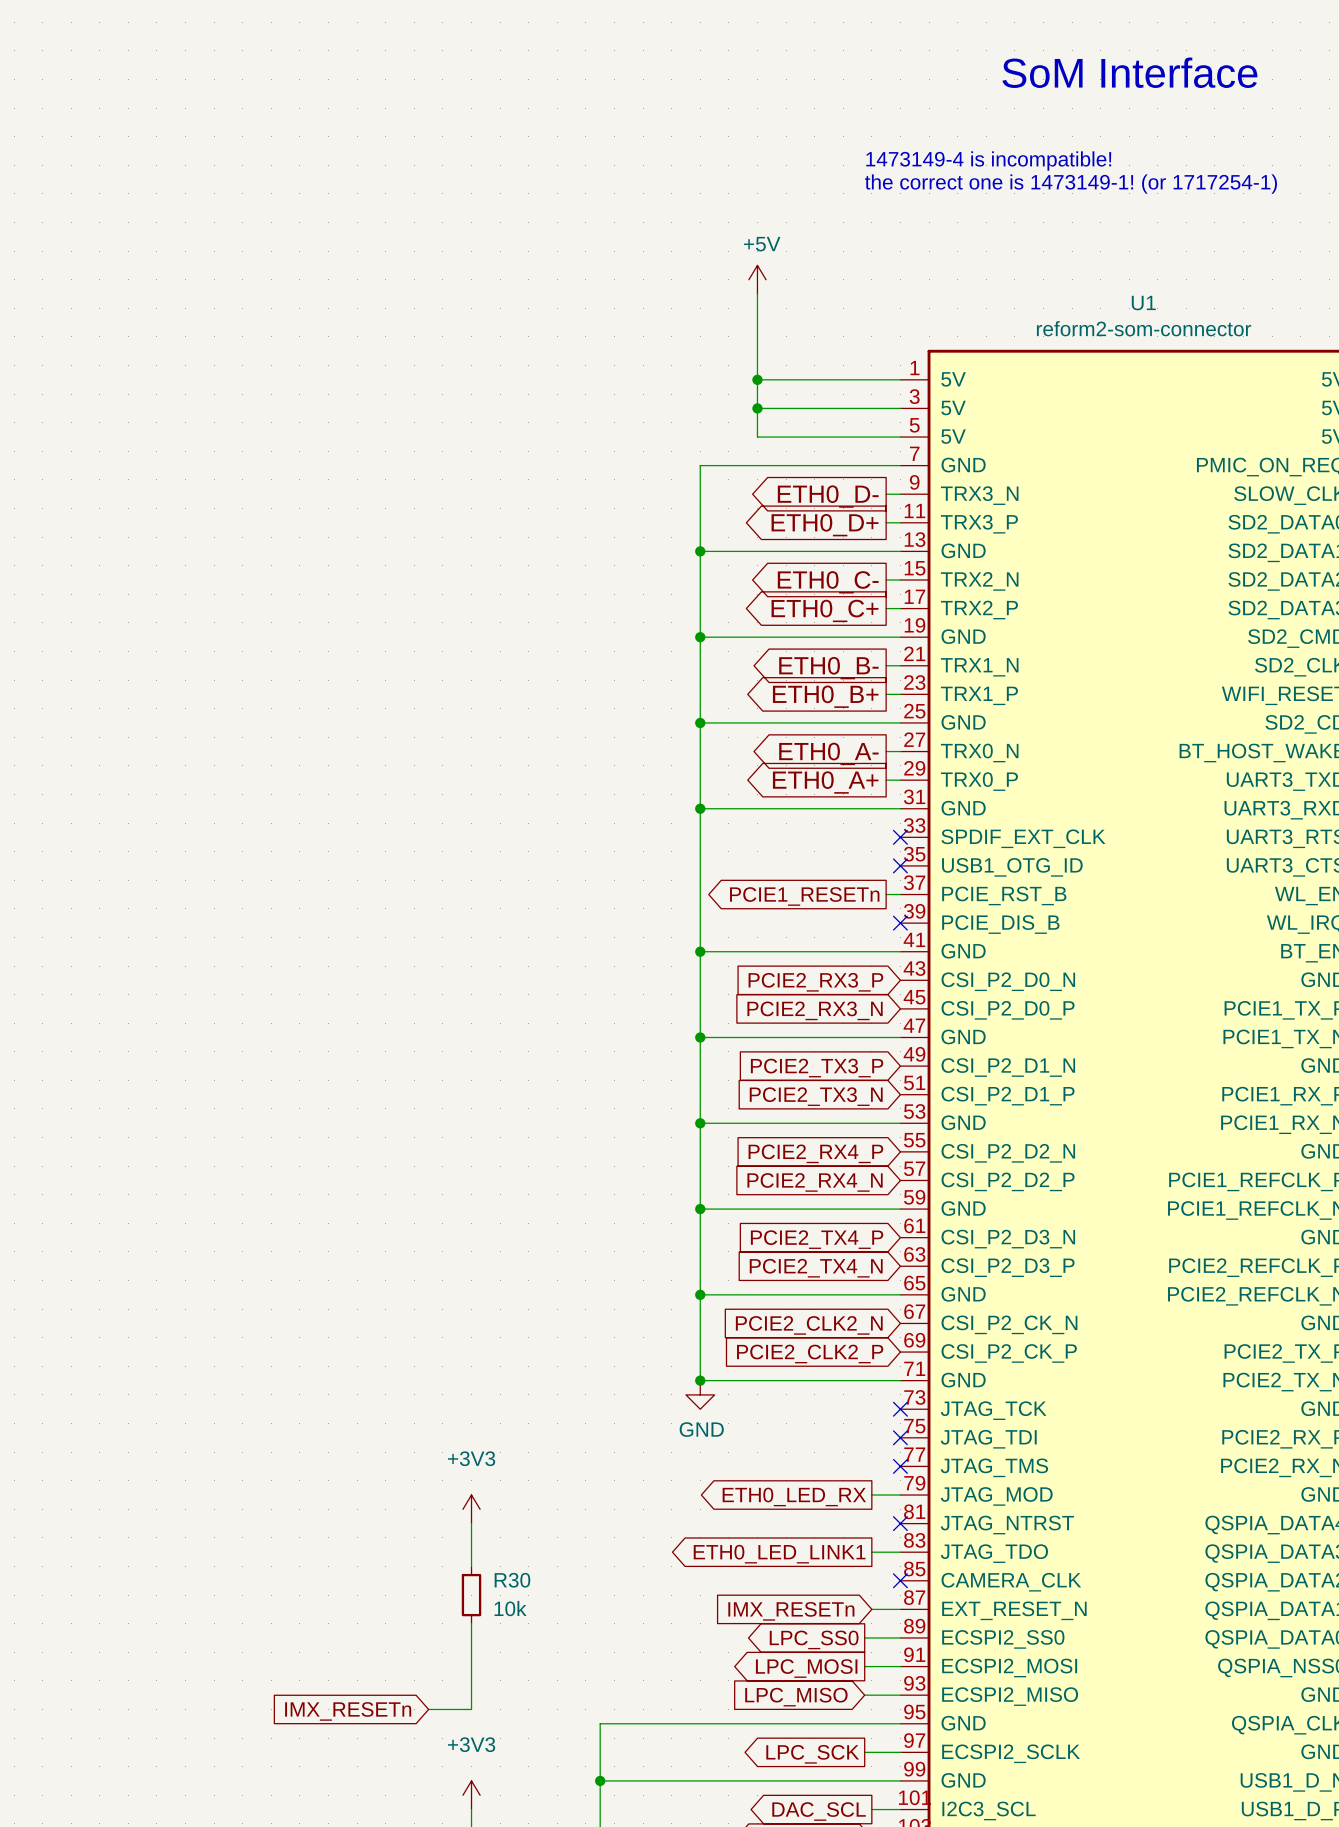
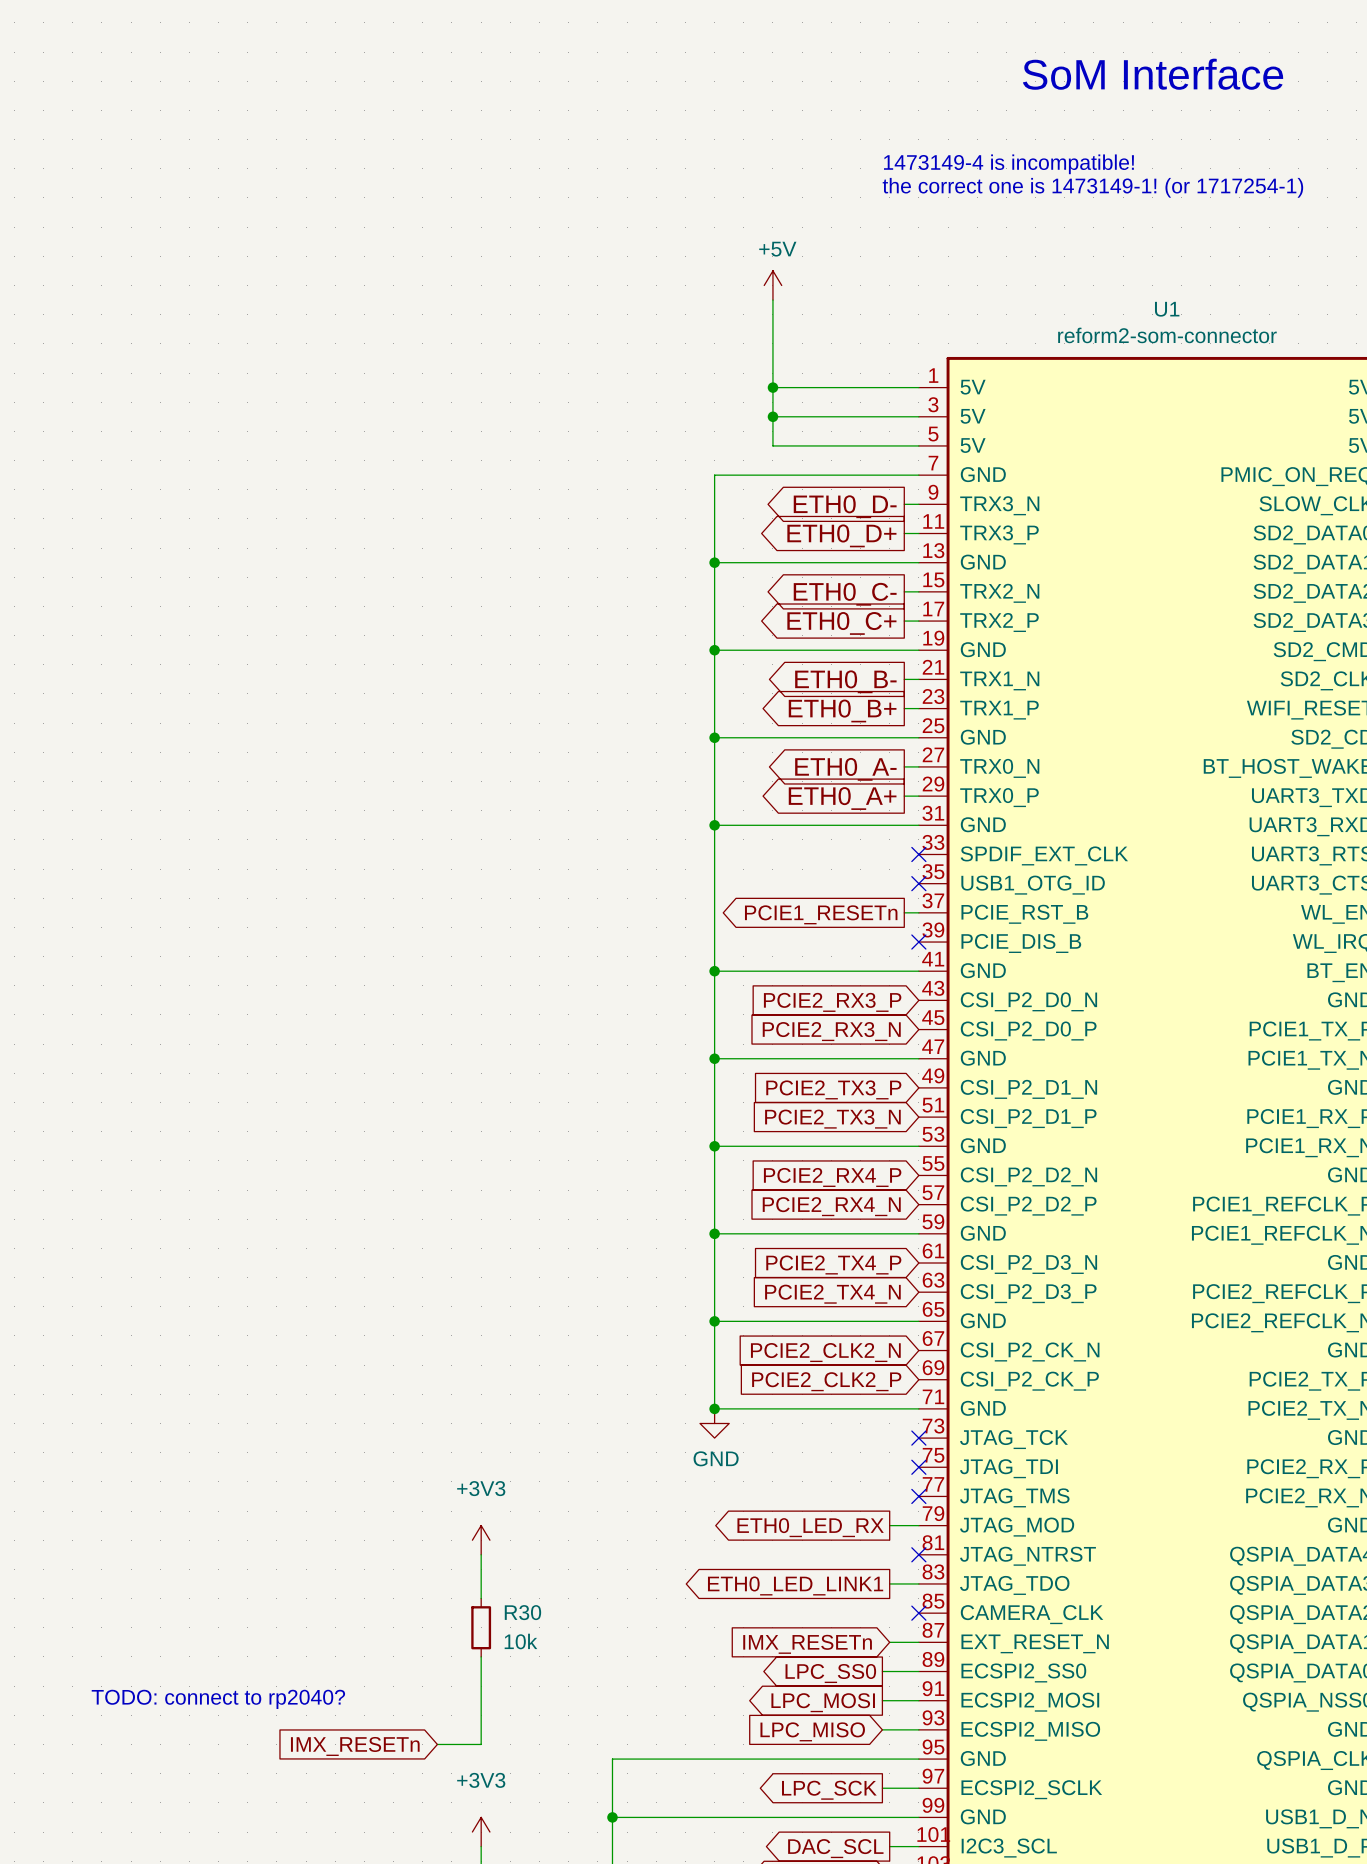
text: none -> TODO: connect to rp2040? (218, 1699)

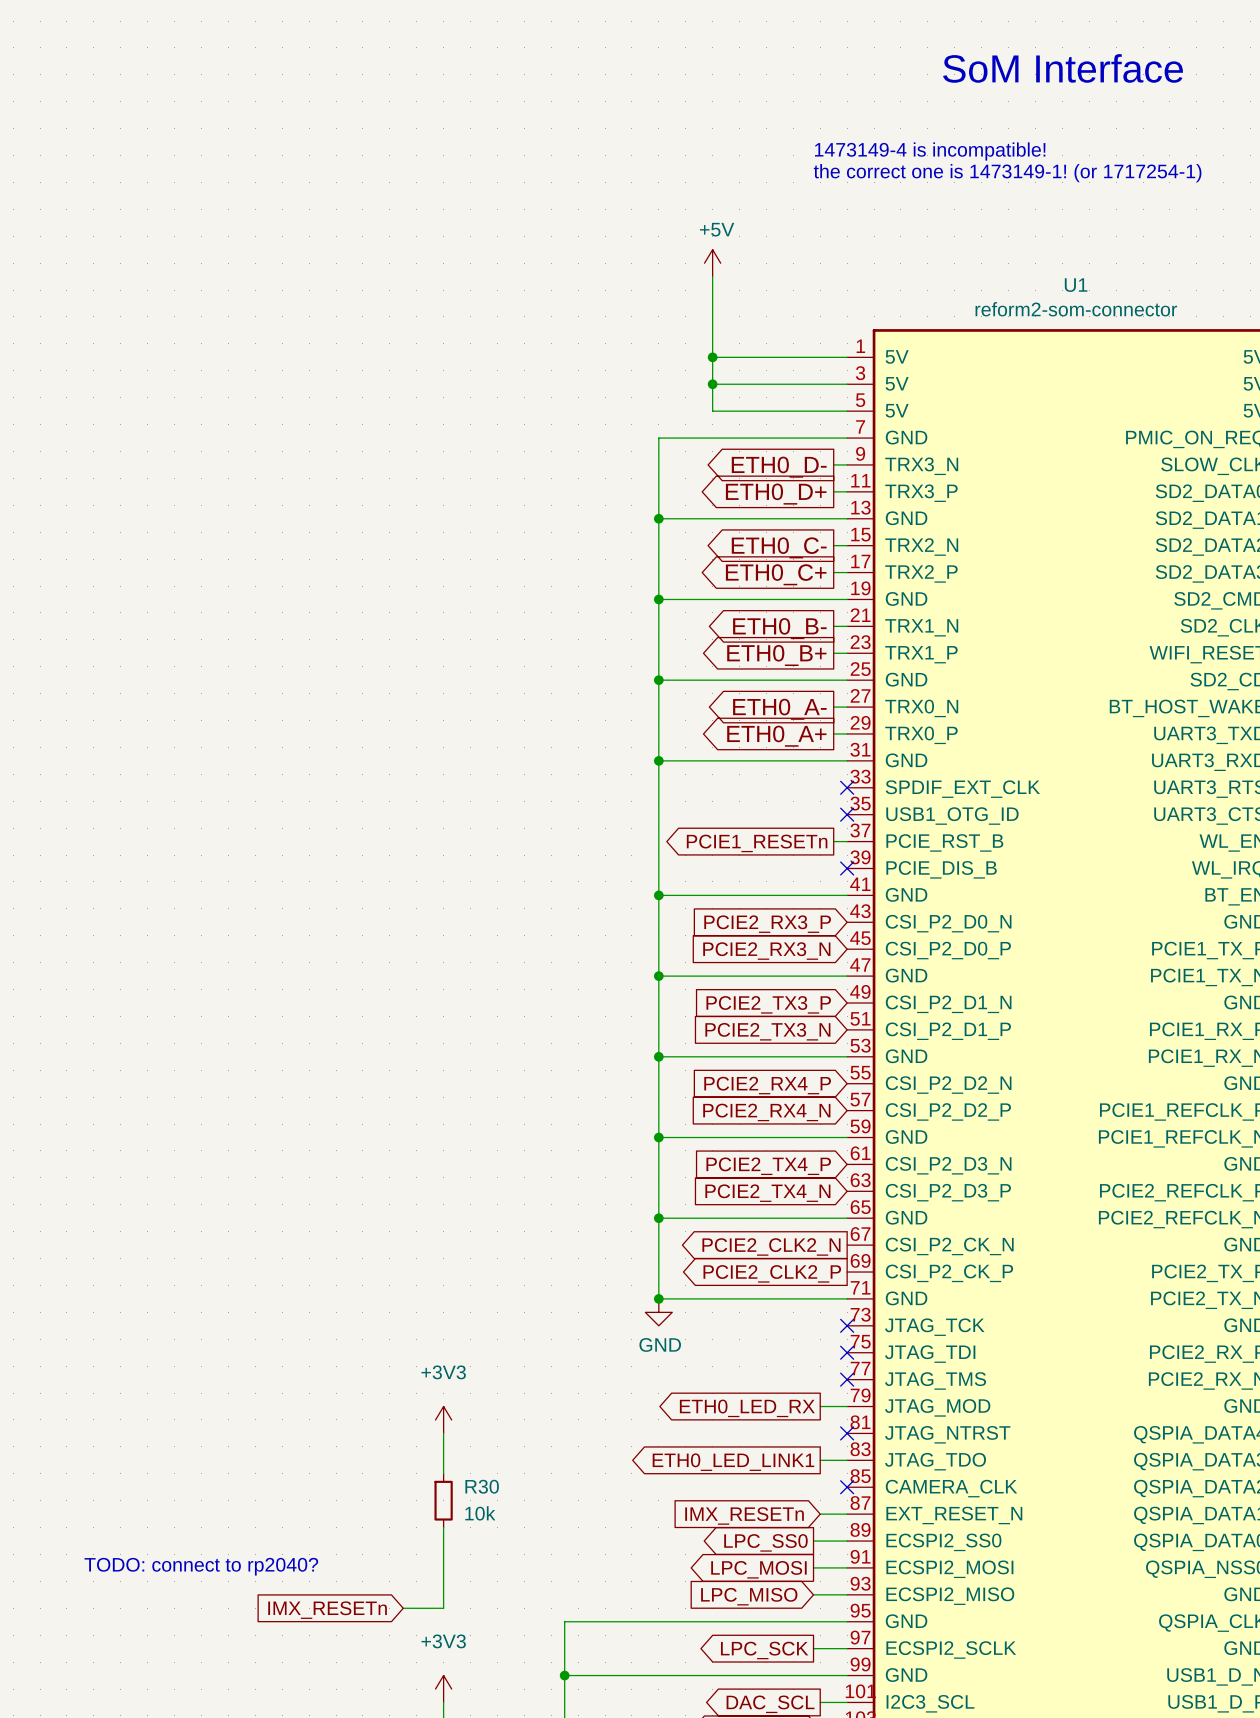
global label shape: input (825, 1352) -> output (771, 1246)
global label shape: input (826, 1381) -> output (772, 1273)

